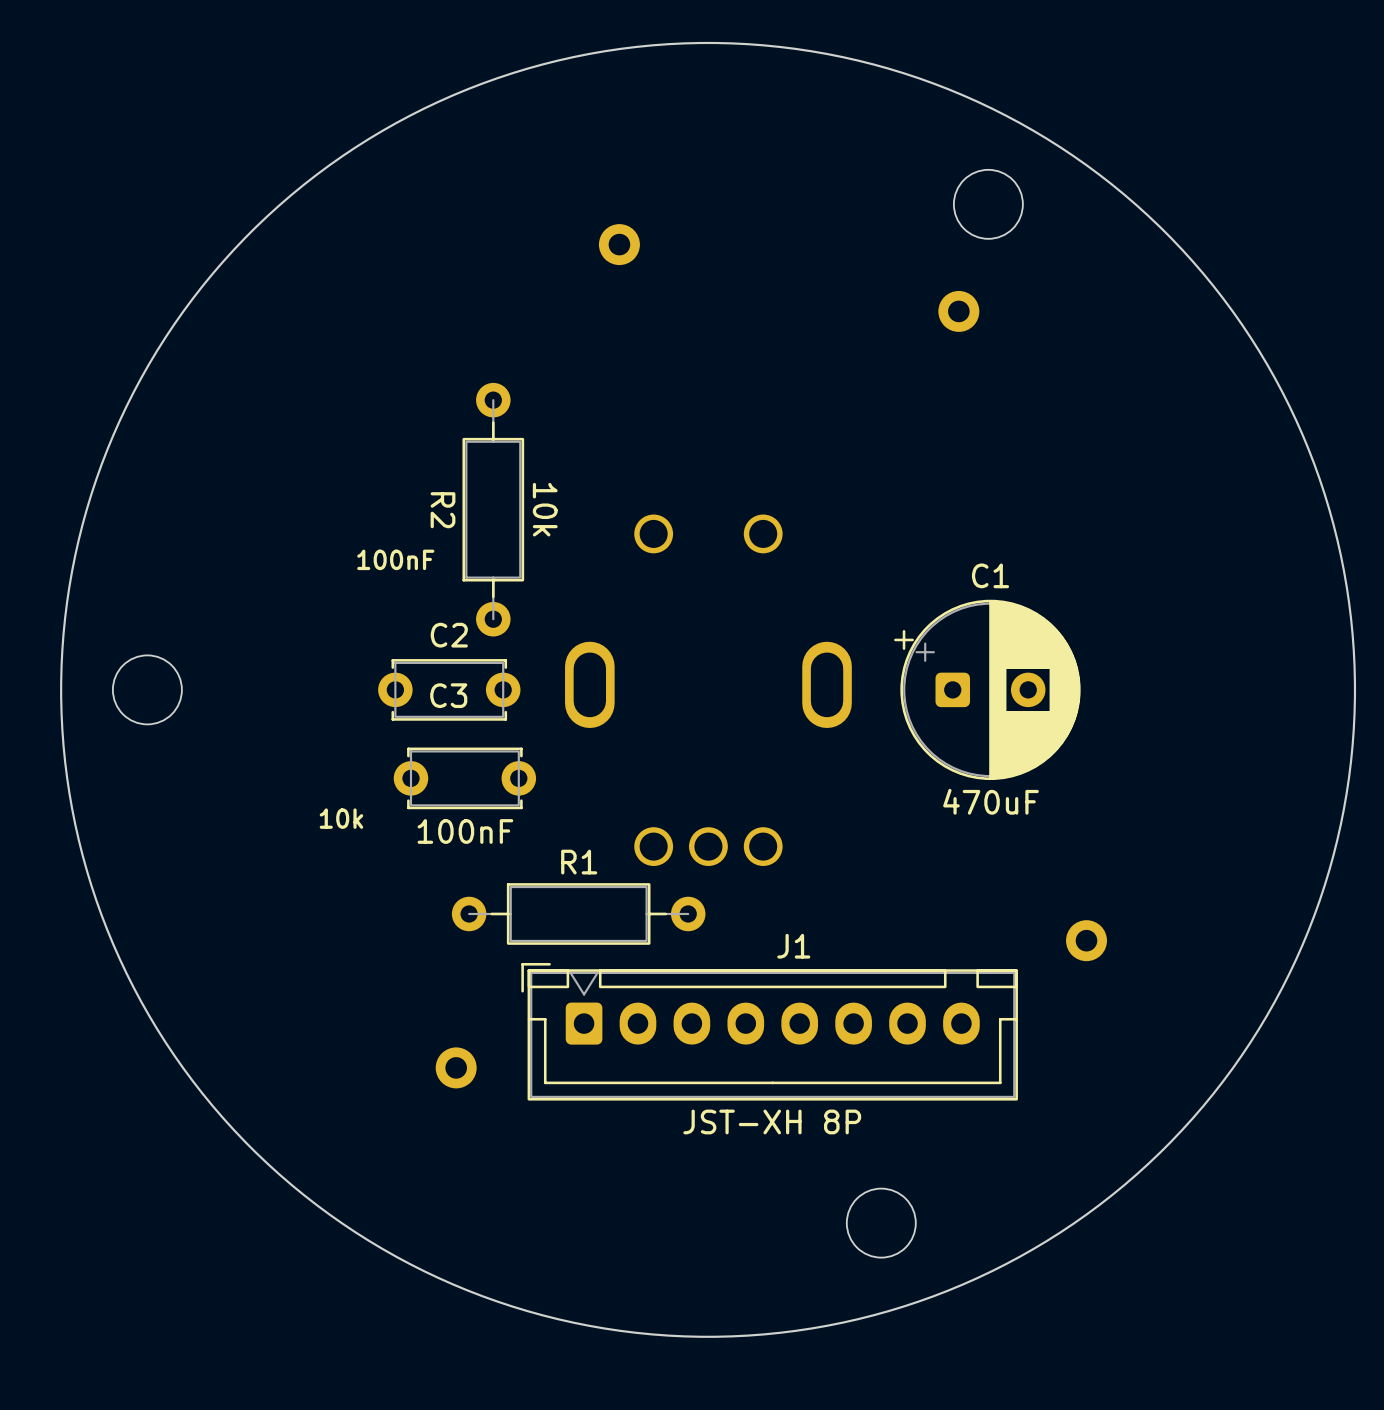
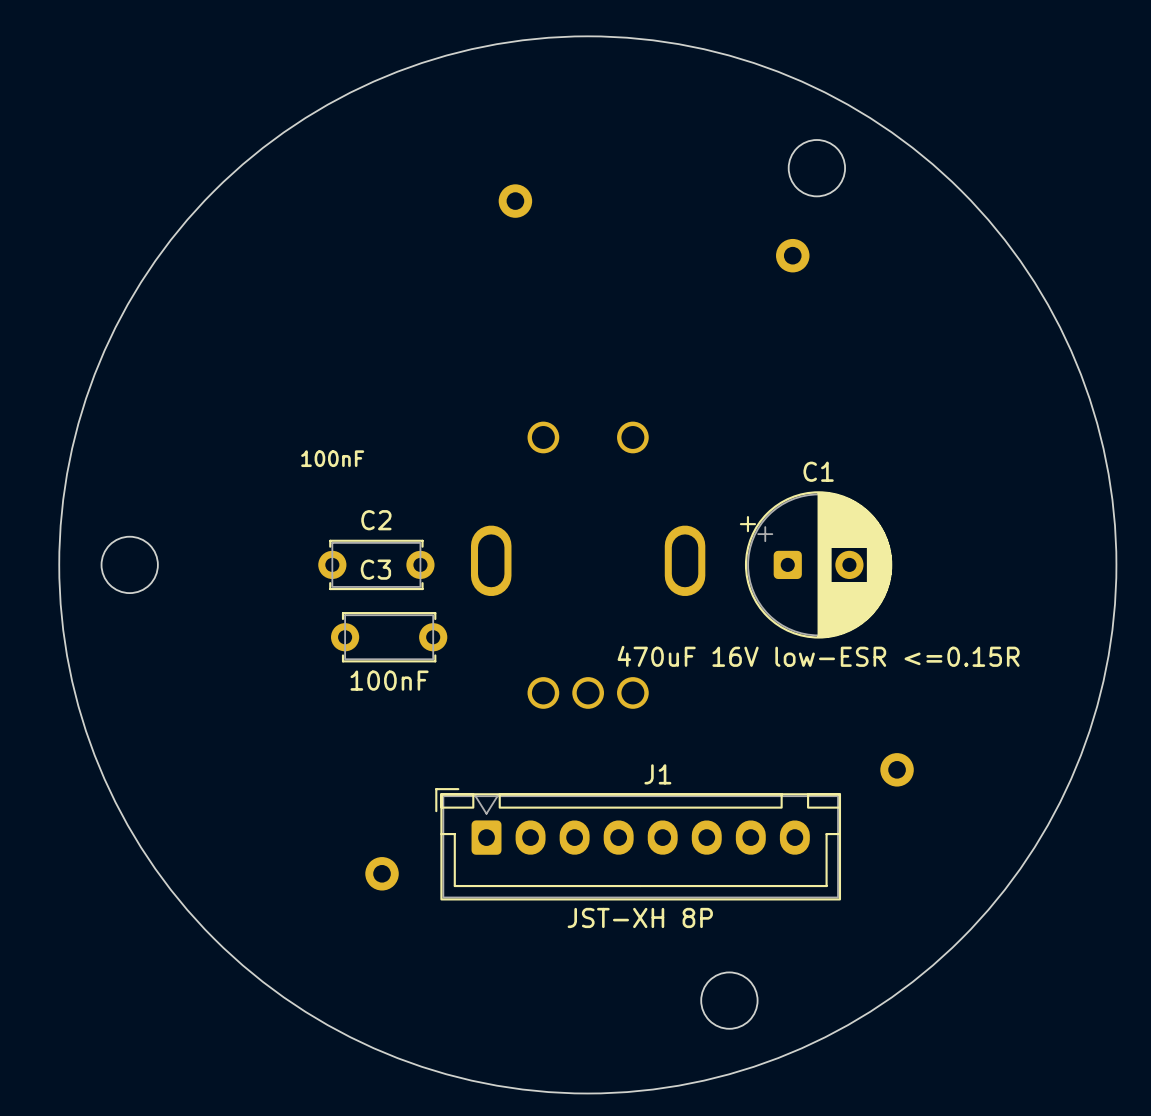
R2: 10k (493, 509) -> none
C1 value: 470uF (991, 801) -> 470uF 16V low-ESR <=0.15R (818, 656)
R1: 10k (578, 913) -> none

